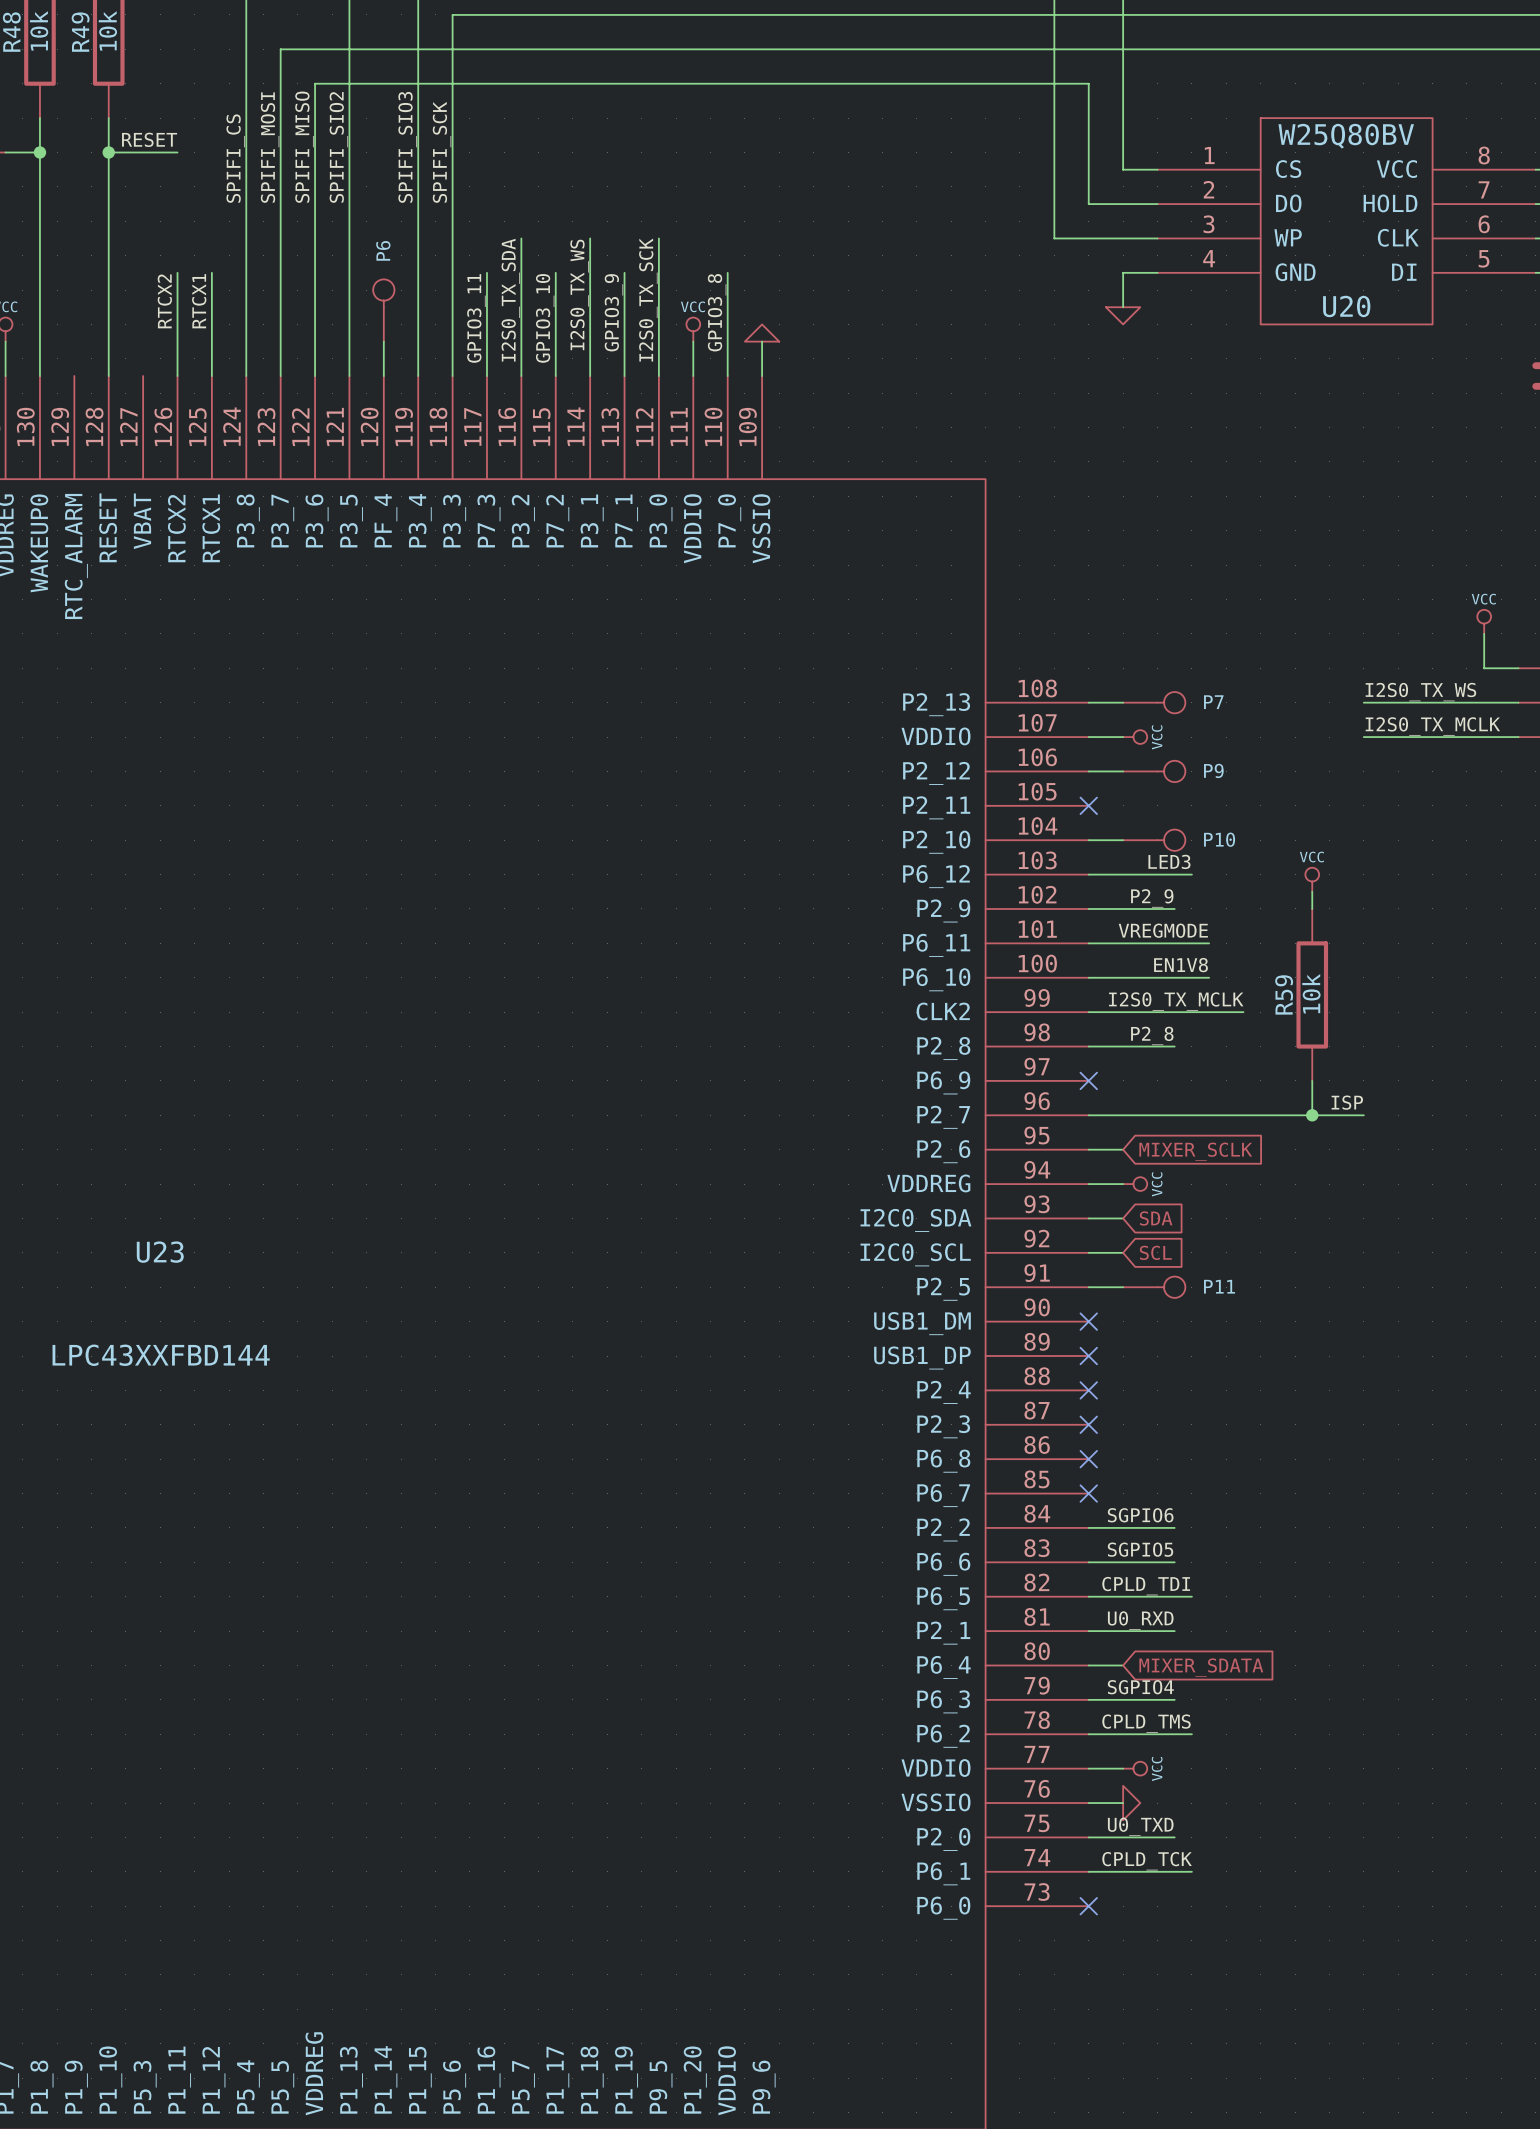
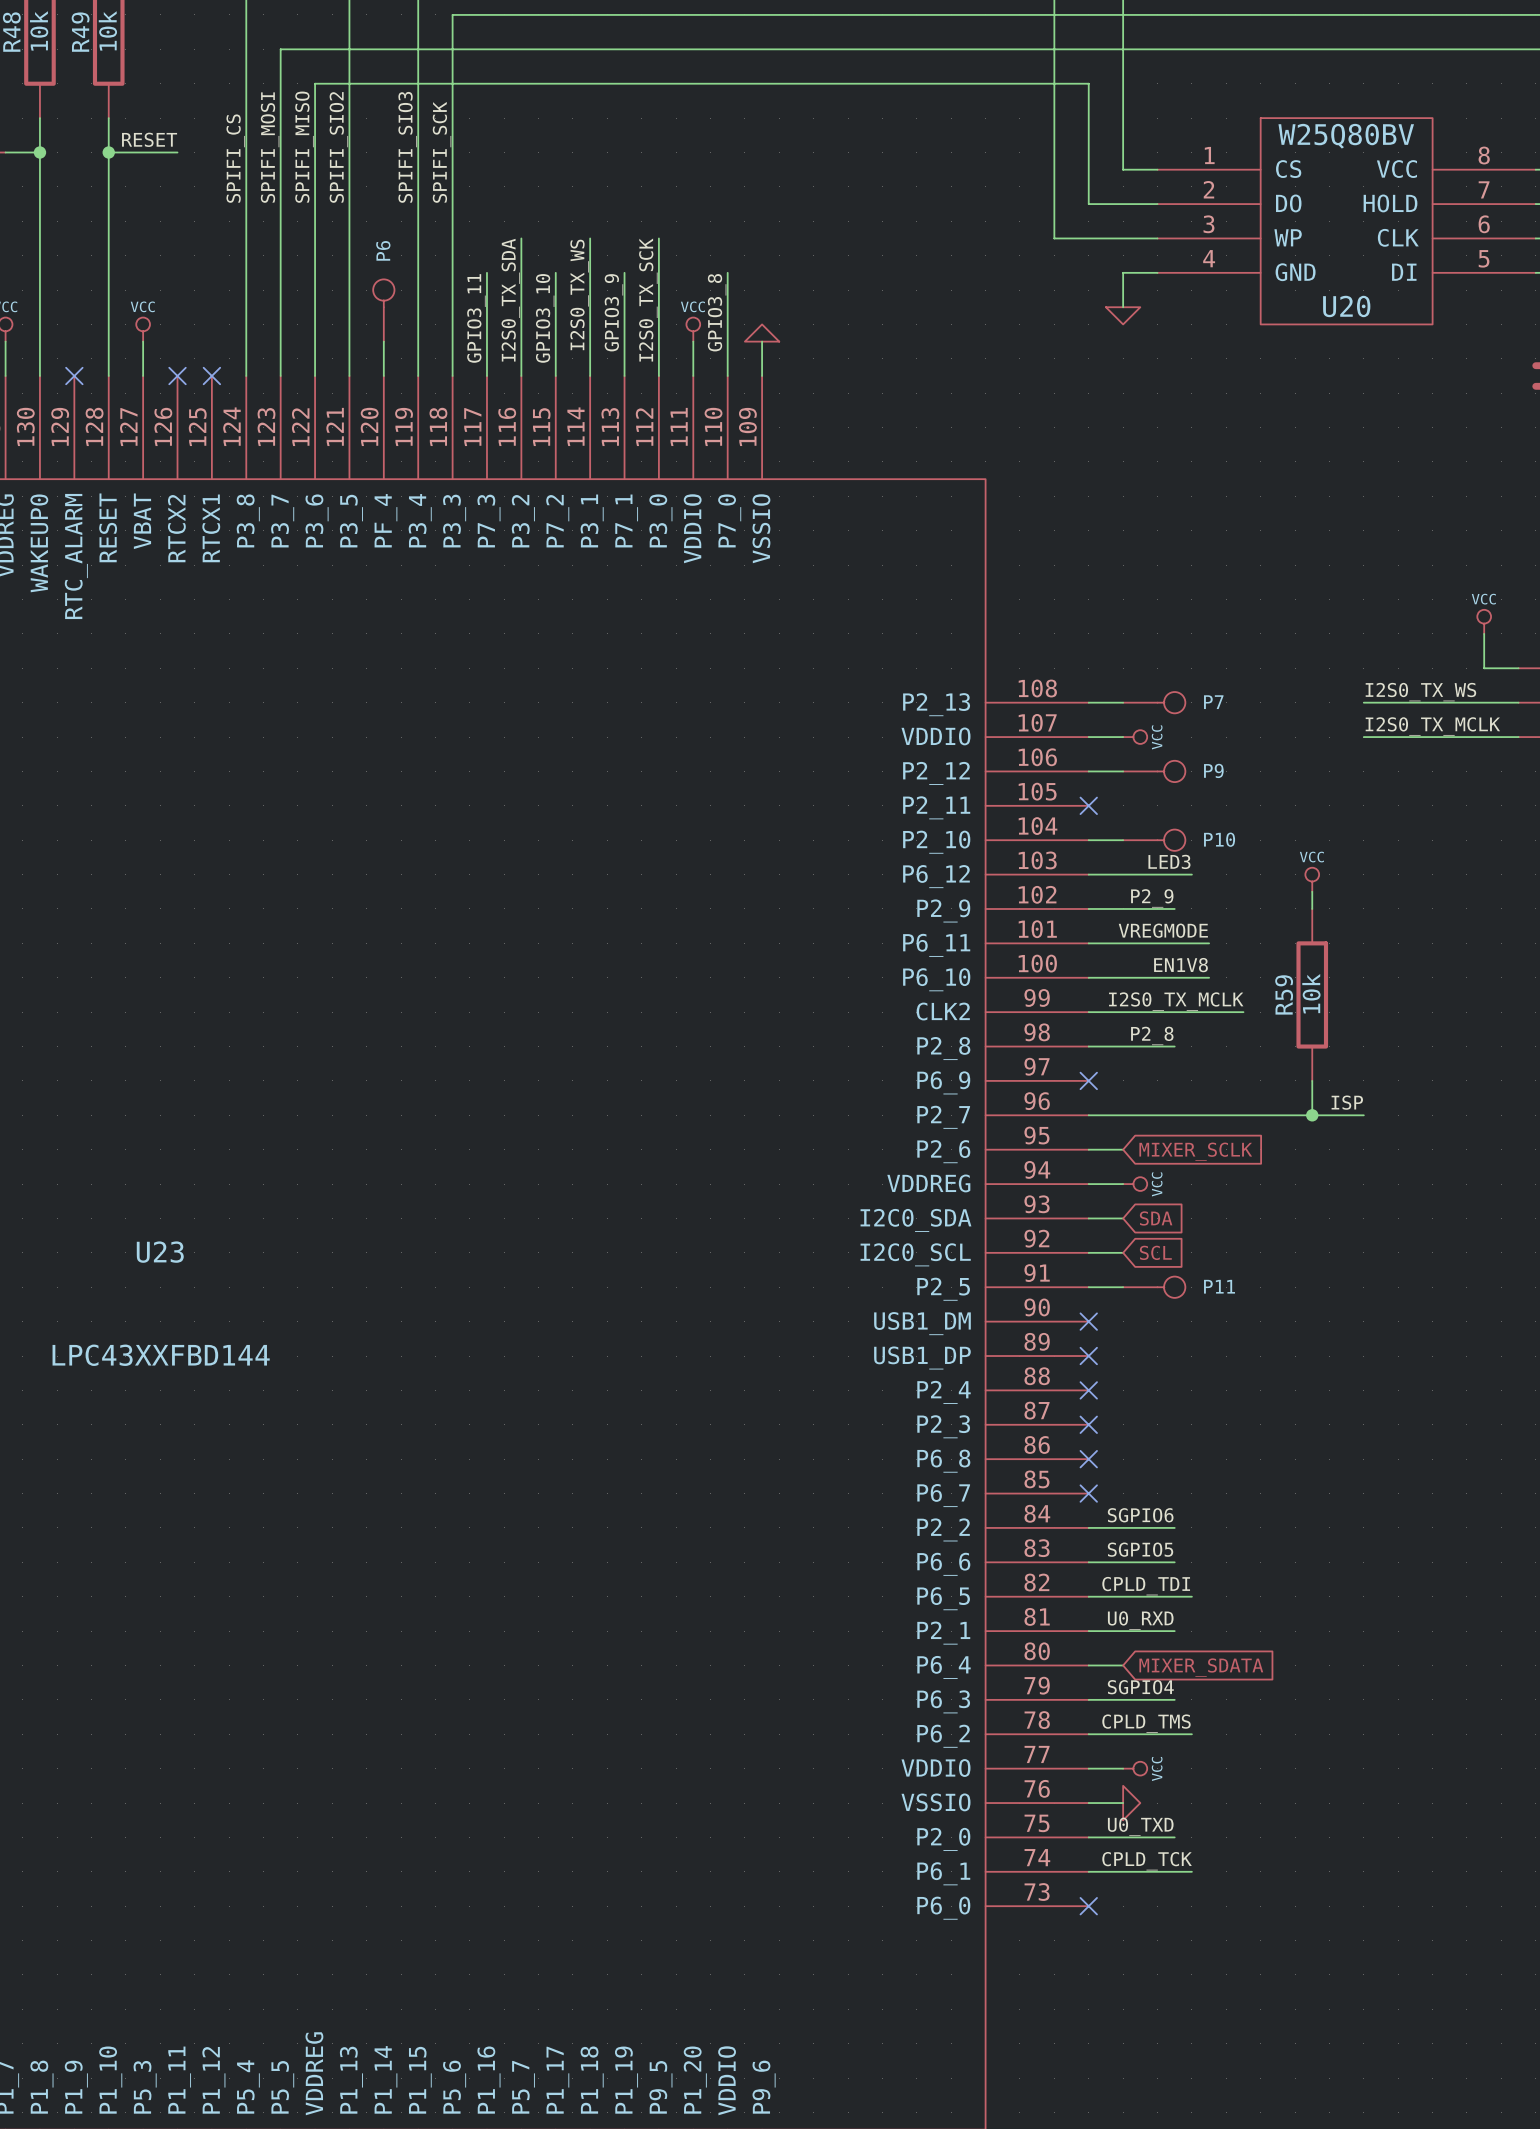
wire: (177, 272) (177, 376) -> none
wire: (211, 272) (211, 376) -> none
label: RTCX2 (164, 301) -> none
label: RTCX1 (199, 301) -> none
power symbol: none -> VCC (143, 329)
wire: none -> (143, 341) (143, 376)
no-connect mark: none -> (74, 376)
no-connect mark: none -> (177, 376)
no-connect mark: none -> (211, 376)

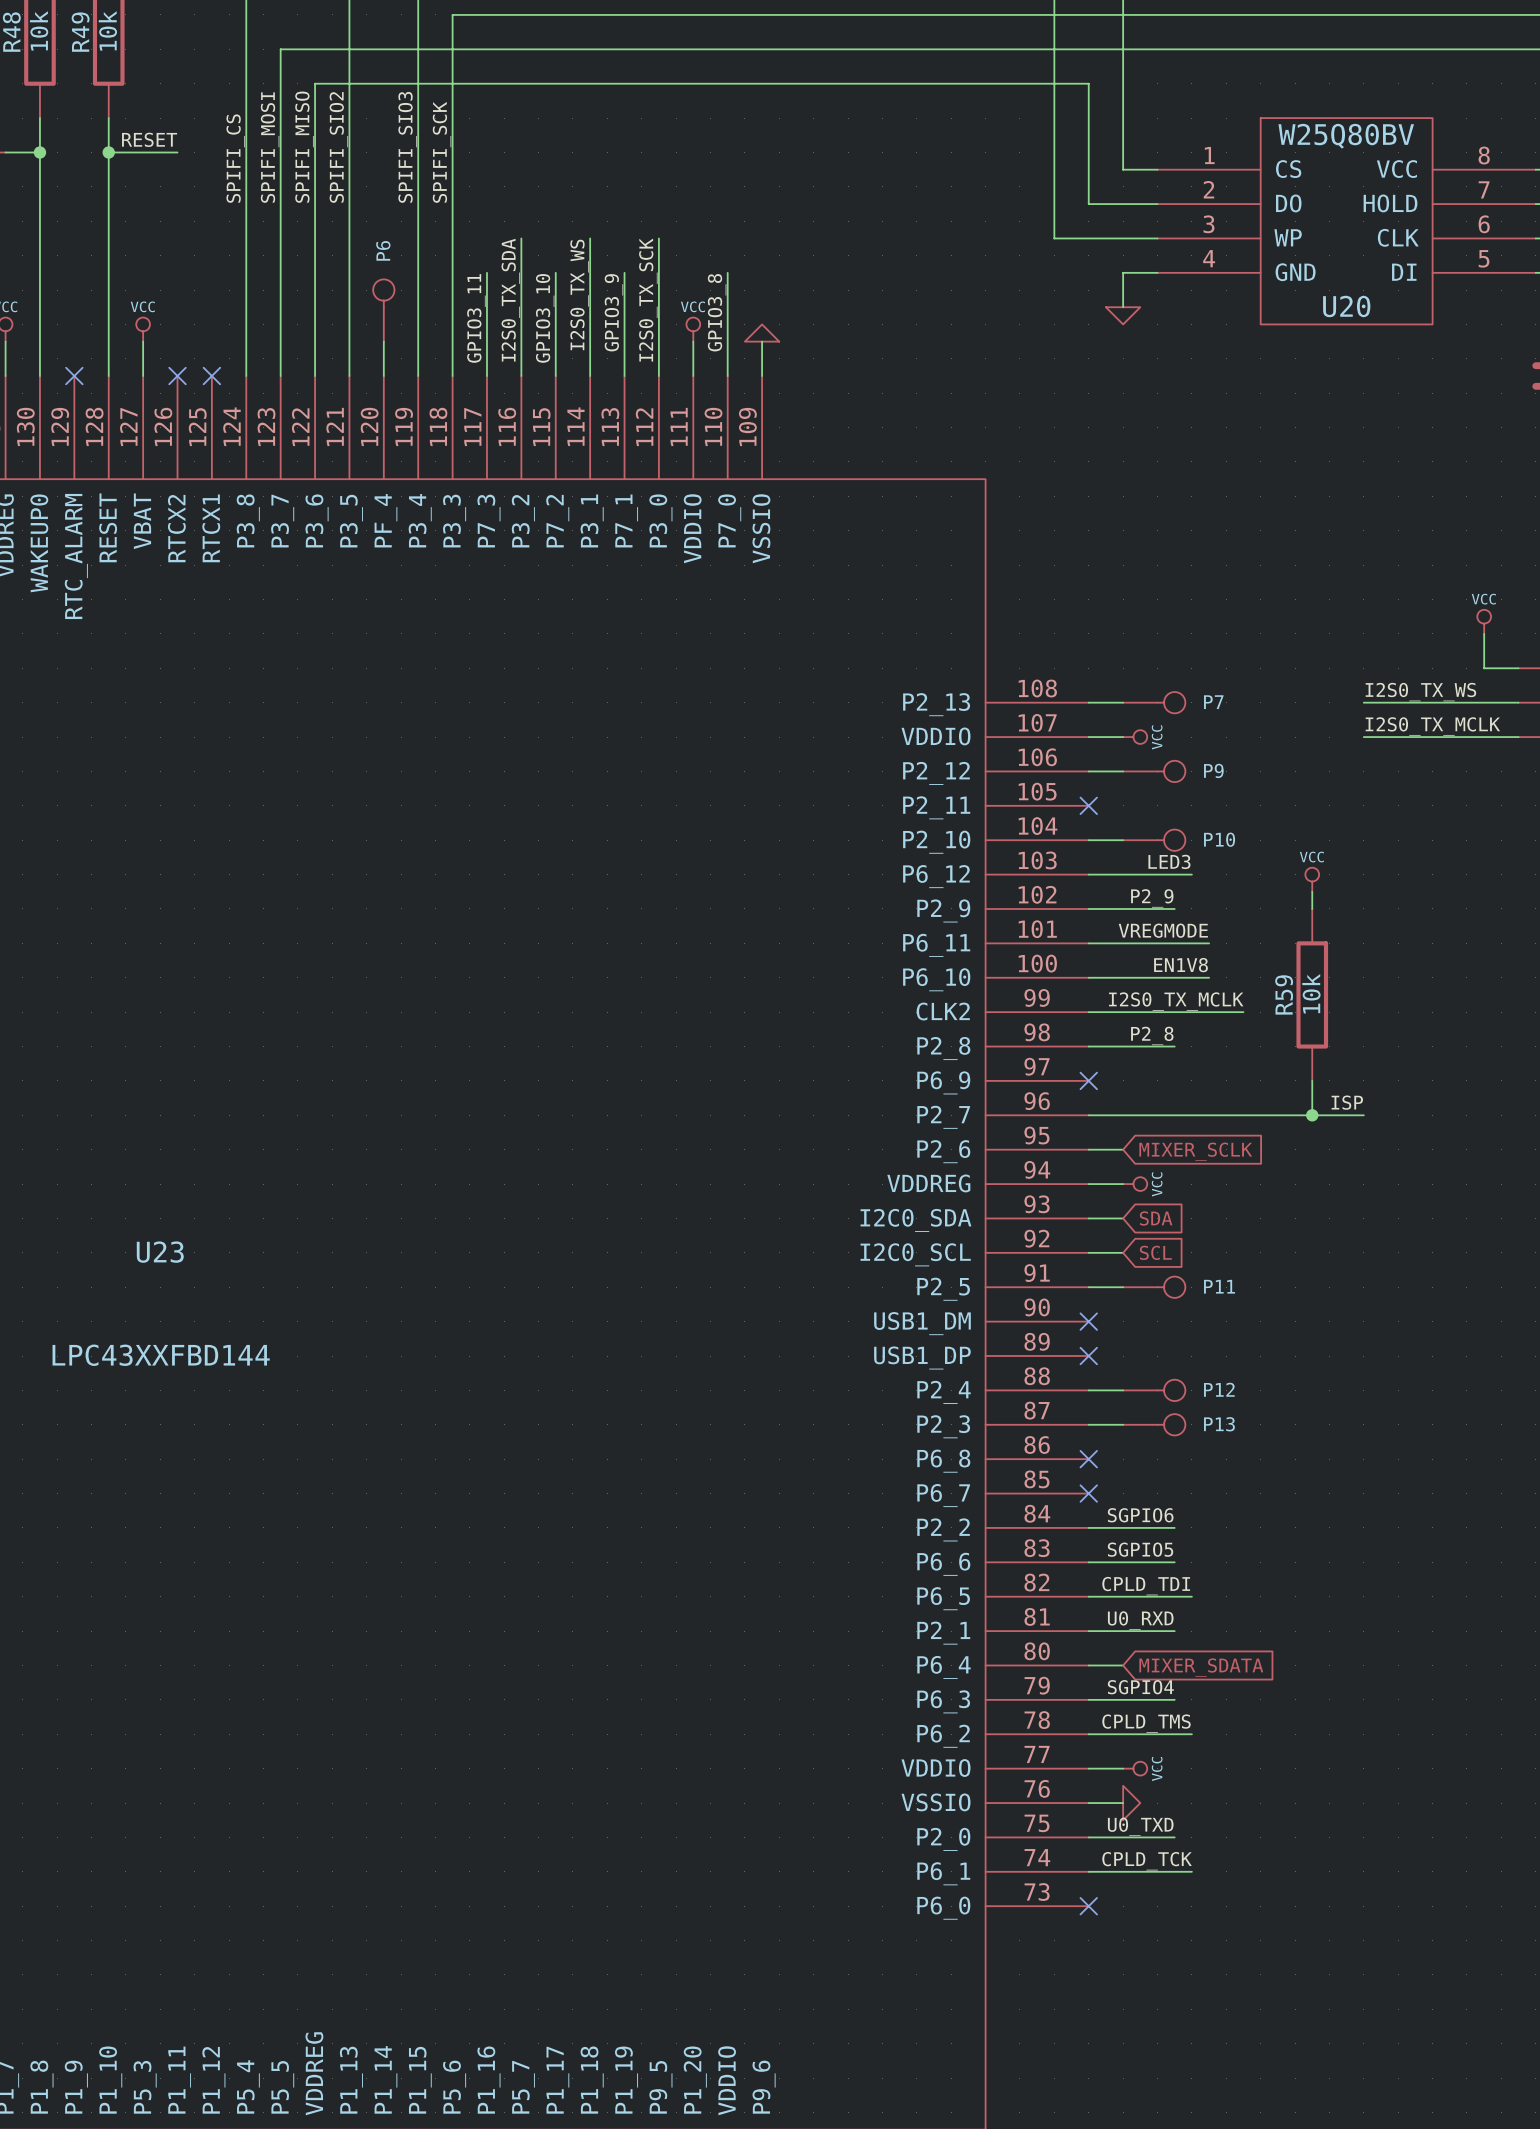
wire: none -> (1088, 1390) (1123, 1390)
no-connect mark: (1088, 1390) -> none
P12: none -> (1154, 1390)
wire: none -> (1088, 1424) (1123, 1424)
no-connect mark: (1088, 1424) -> none
P13: none -> (1154, 1424)

